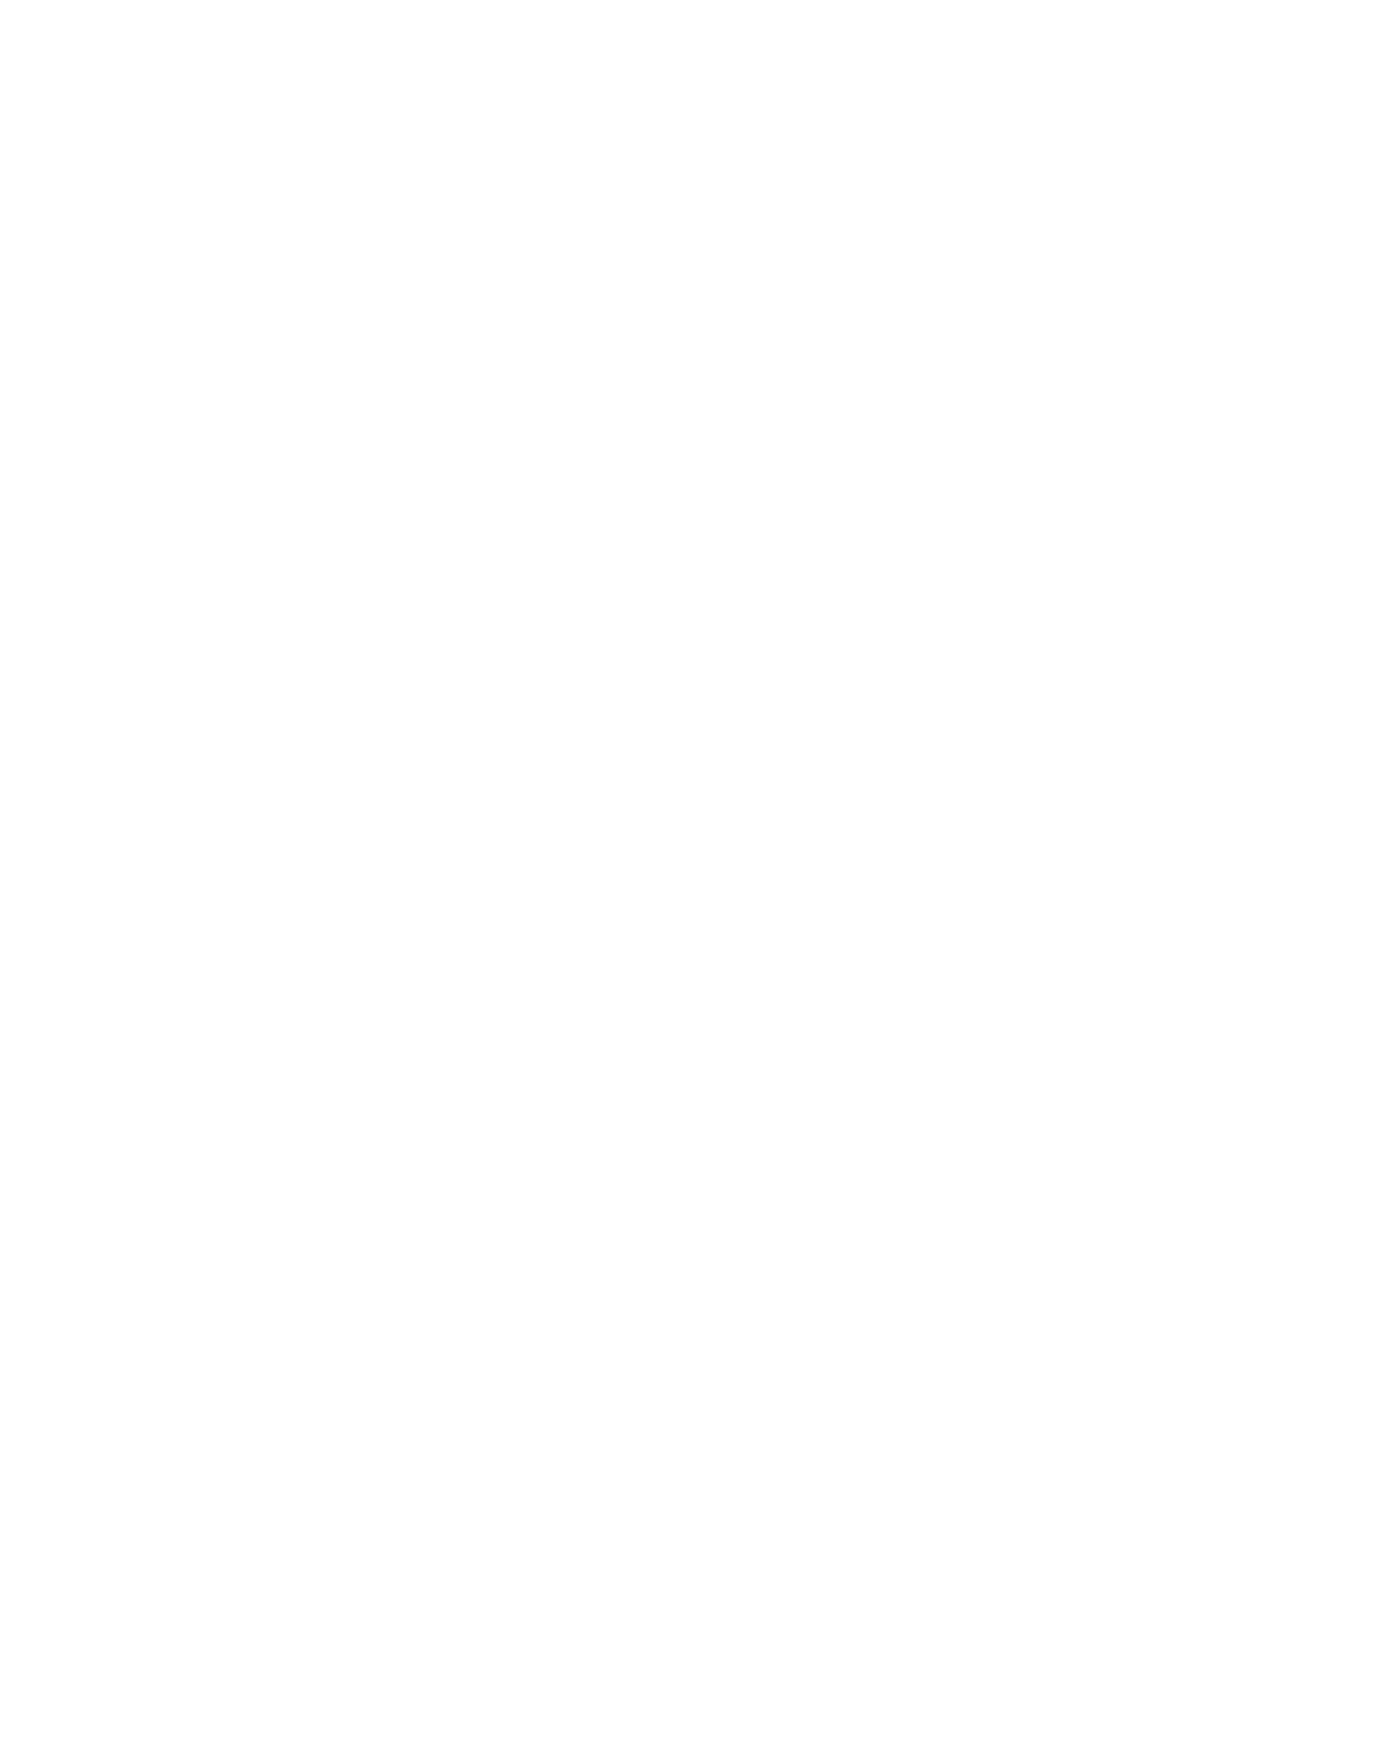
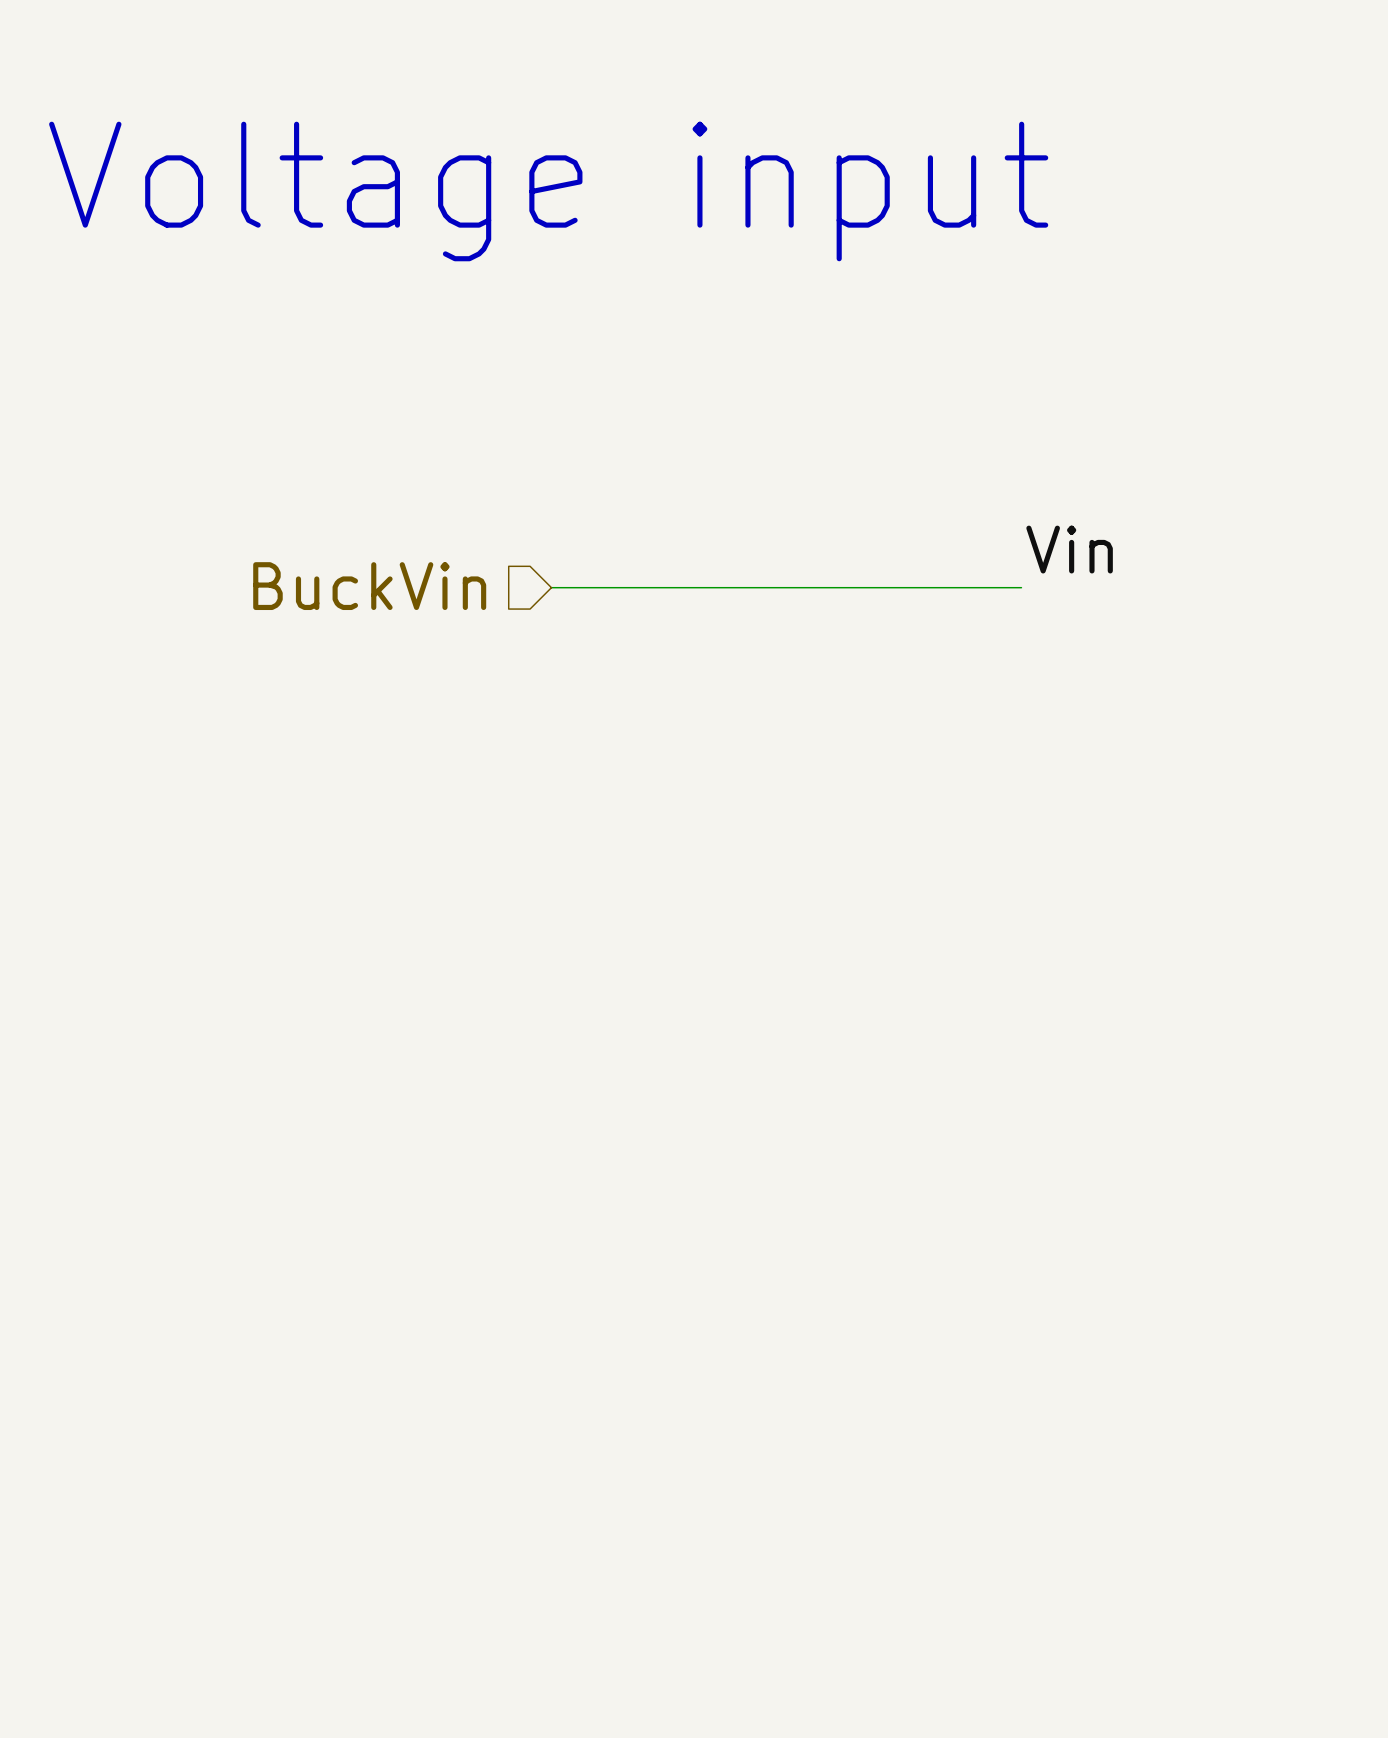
text: none -> Voltage input (548, 191)
label: none -> Vin (1069, 549)
hierarchical label: none -> BuckVin (369, 586)
wire: none -> (551, 587) (1021, 587)

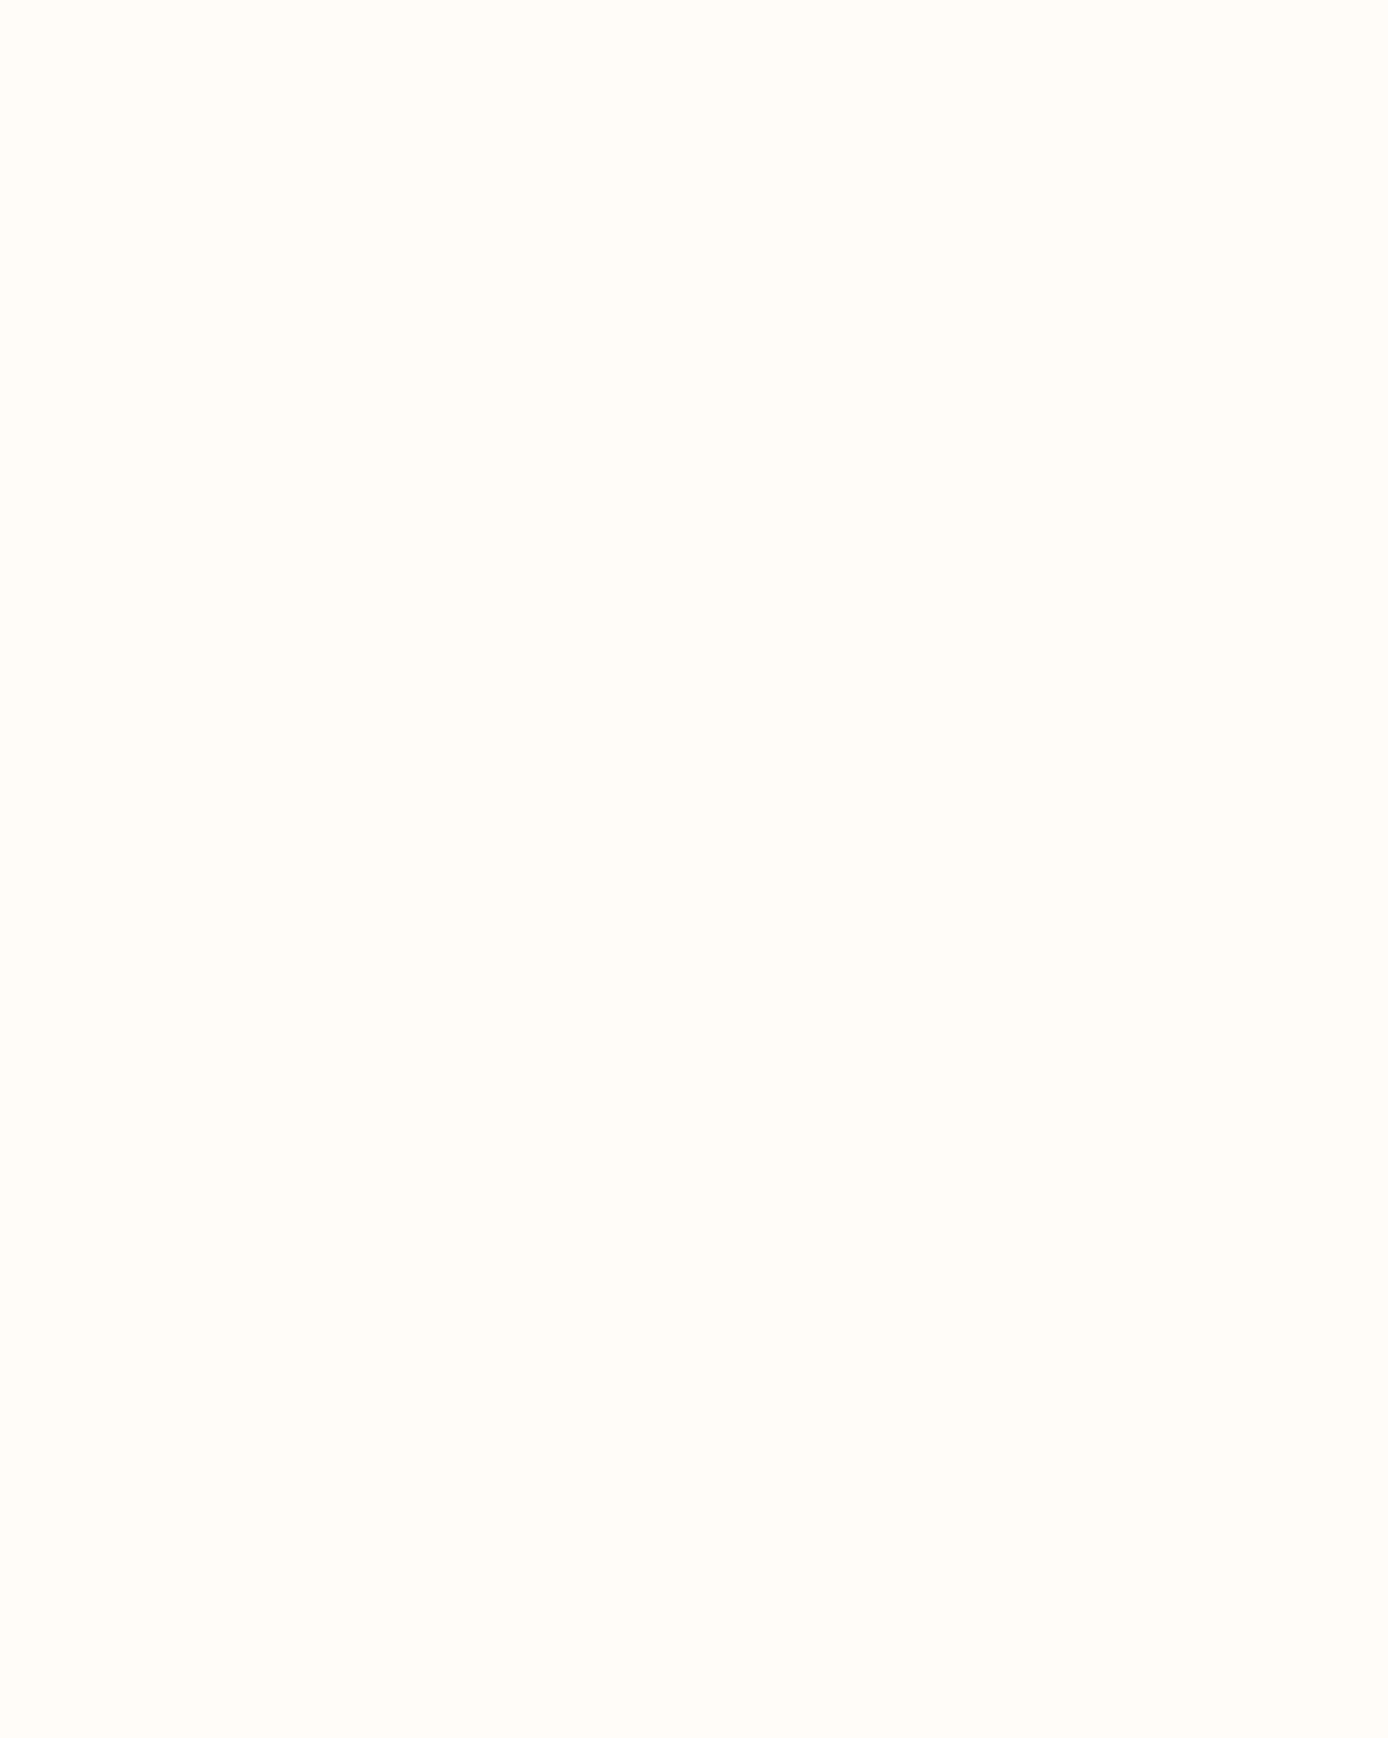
text: Voltage input (548, 191) -> none
label: Vin (1069, 549) -> none
hierarchical label: BuckVin (369, 586) -> none
wire: (551, 587) (1021, 587) -> none

